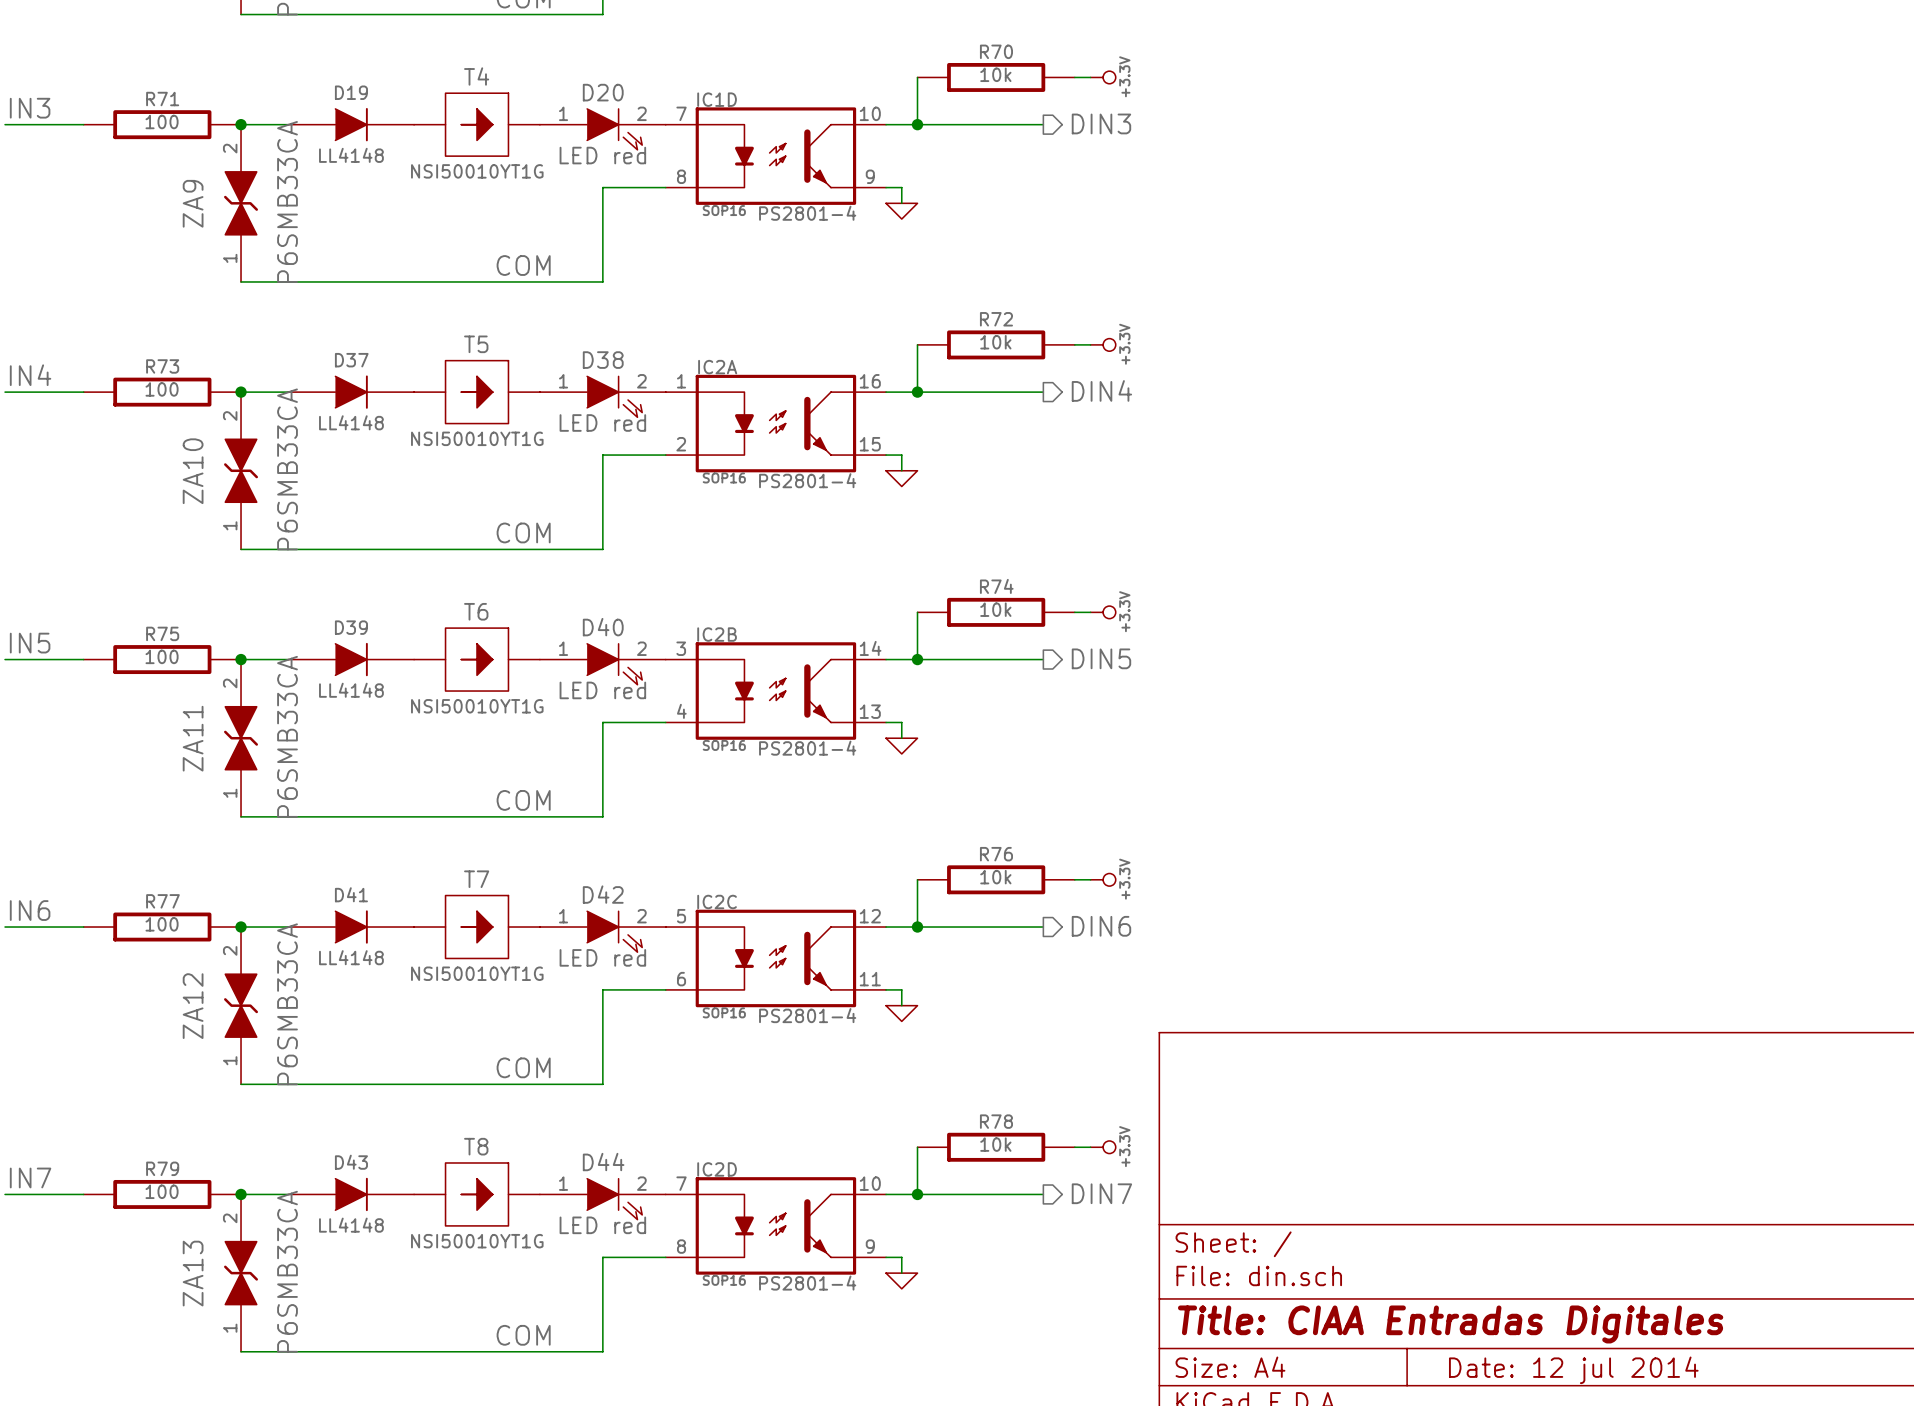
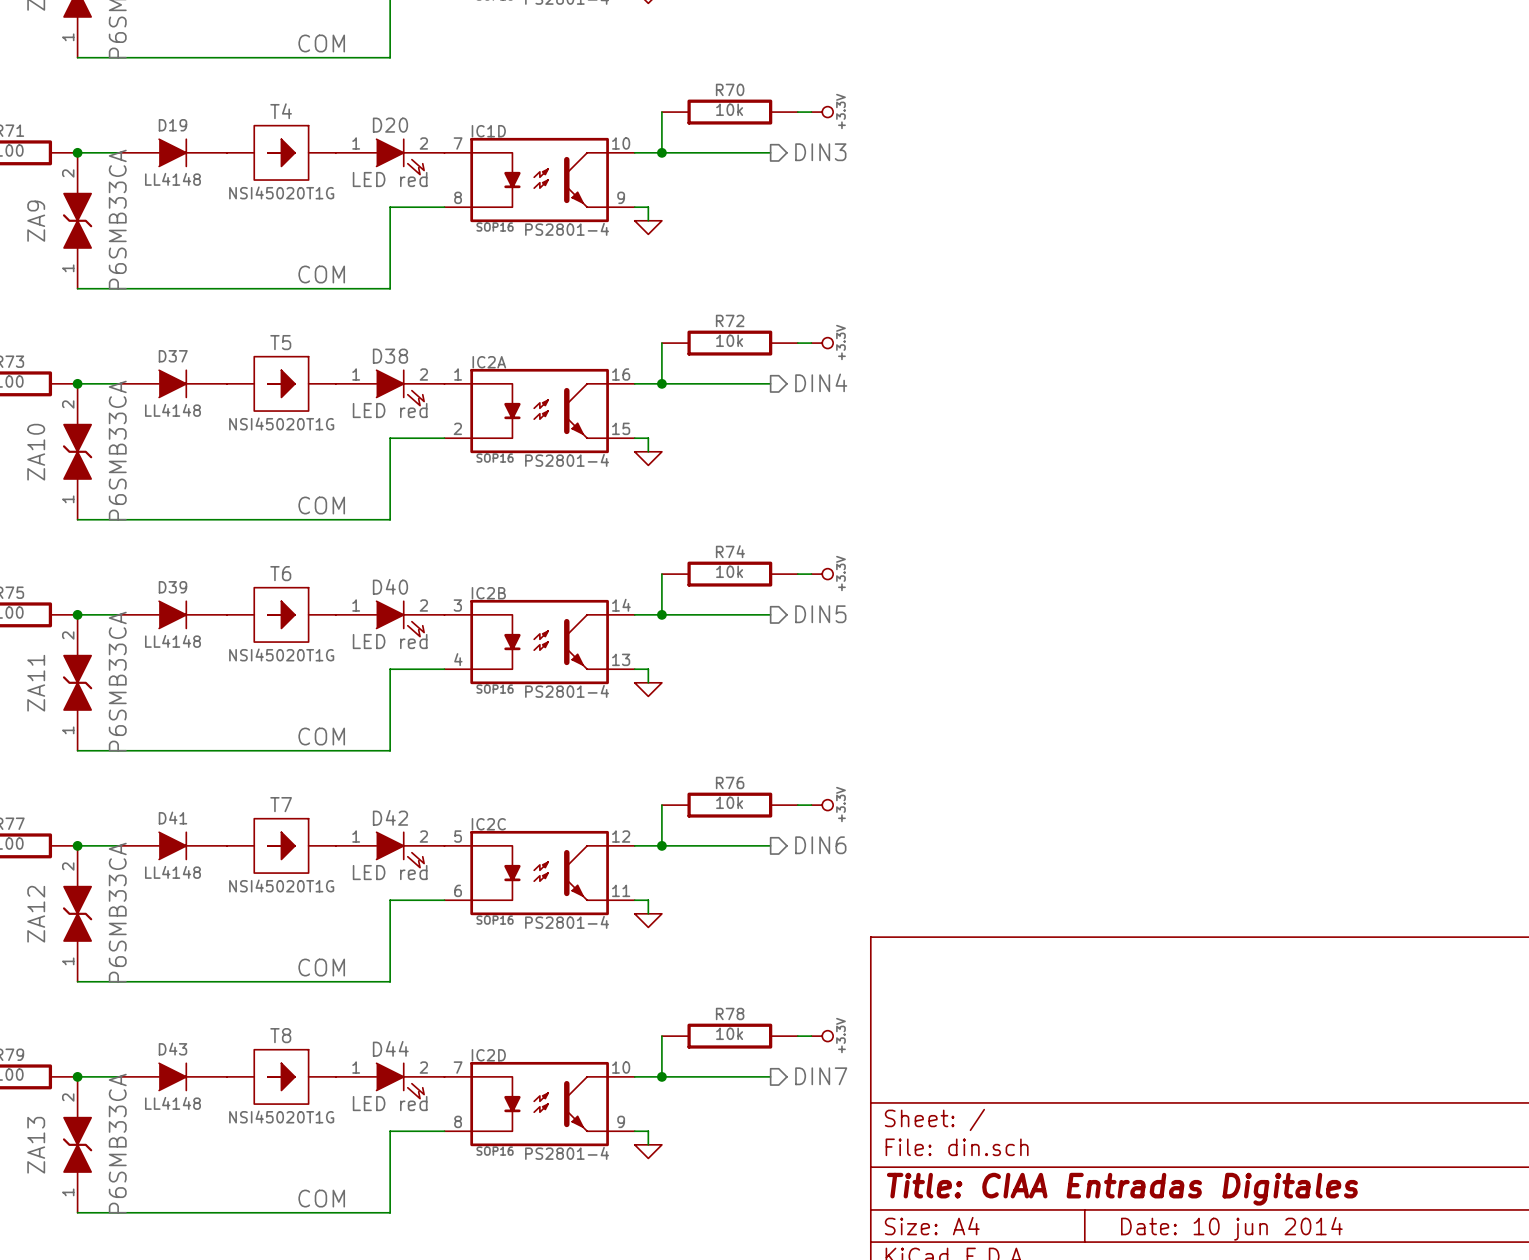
T4 value: NSI50010YT1G (477, 171) -> NSI45020T1G (281, 192)
T5 value: NSI50010YT1G (477, 438) -> NSI45020T1G (281, 423)
T6 value: NSI50010YT1G (477, 706) -> NSI45020T1G (281, 654)
T7 value: NSI50010YT1G (477, 973) -> NSI45020T1G (281, 885)
T8 value: NSI50010YT1G (477, 1241) -> NSI45020T1G (281, 1116)
title block: Date: 12 jul 2014 (1573, 1370) -> Date: 10 jun 2014 (1231, 1228)

